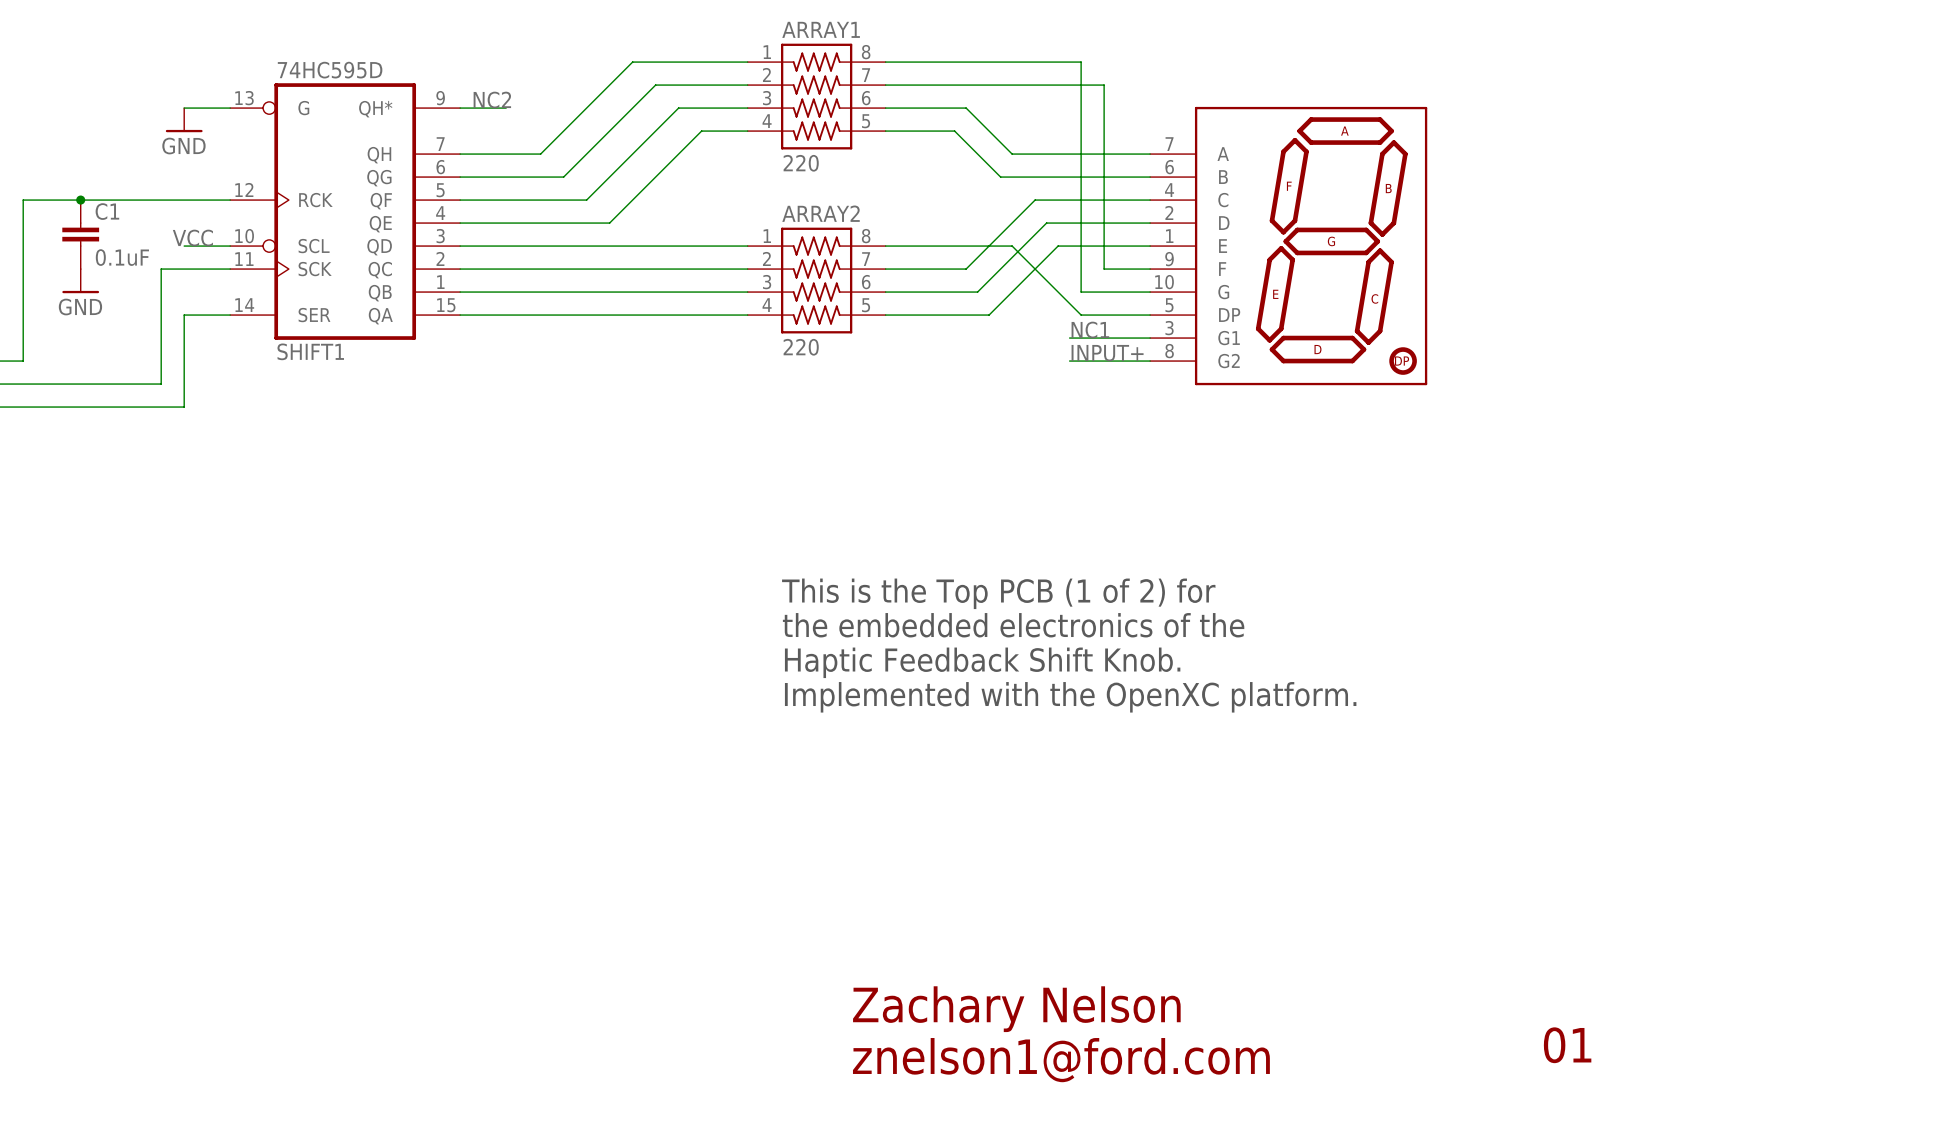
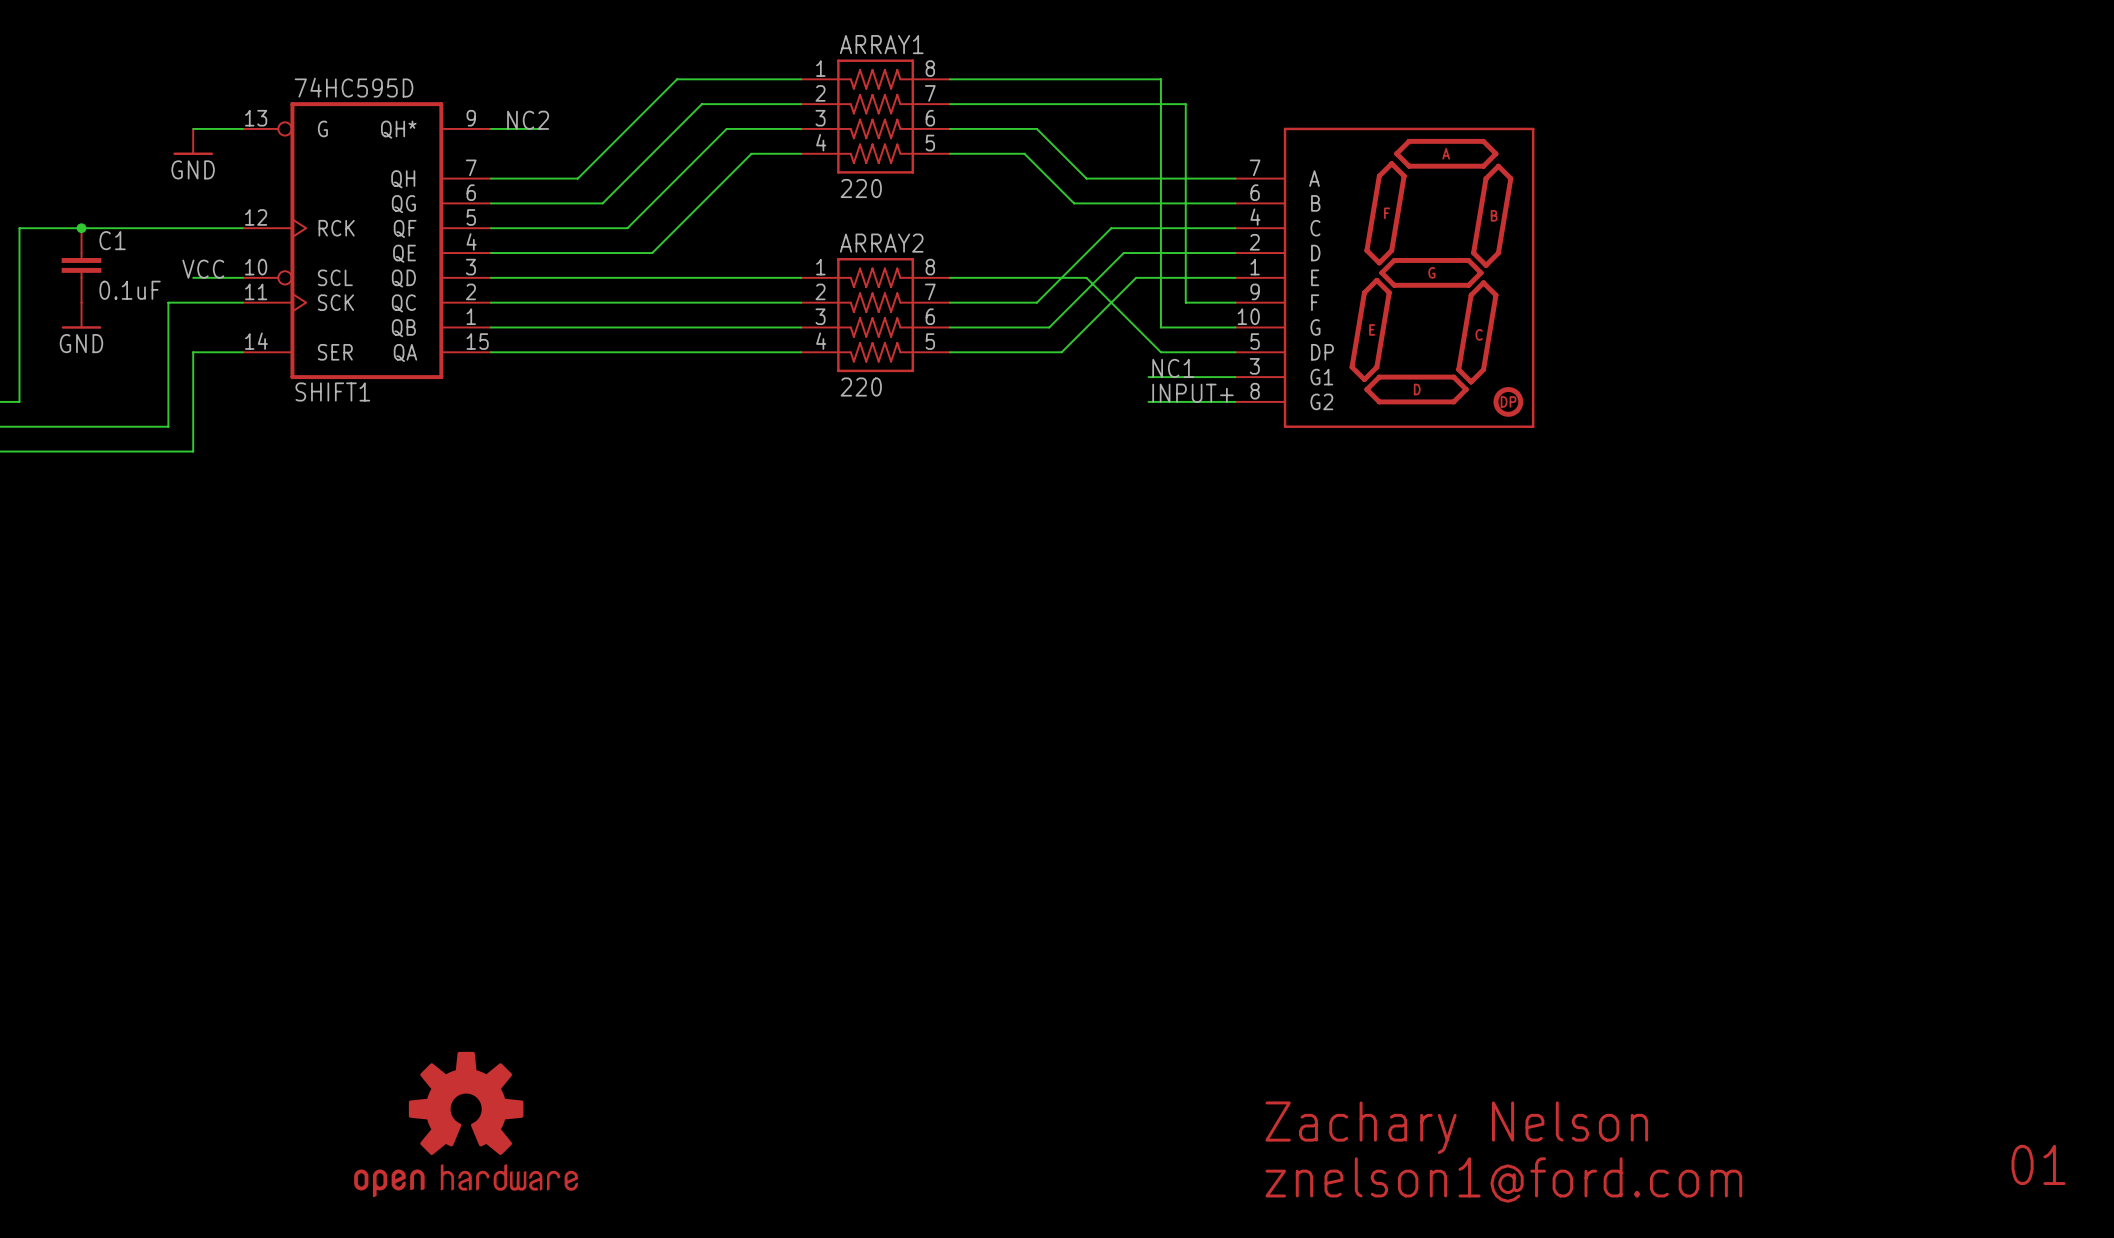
text: This is the Top PCB (1 of 2) for (998, 593) -> none
text: the embedded electronics of the (1013, 625) -> none
text: Haptic Feedback Shift Knob. (982, 662) -> none
text: Implemented with the OpenXC platform. (1070, 697) -> none
text: Zachary Nelson (1016, 1009) -> none
part: none -> (466, 1124)
text: none -> Zachary Nelson (1456, 1127)
text: 01 (1567, 1045) -> none
text: znelson1@ford.com (1061, 1060) -> none
text: none -> 01 (2038, 1164)
text: none -> znelson1@ford.com (1503, 1180)

